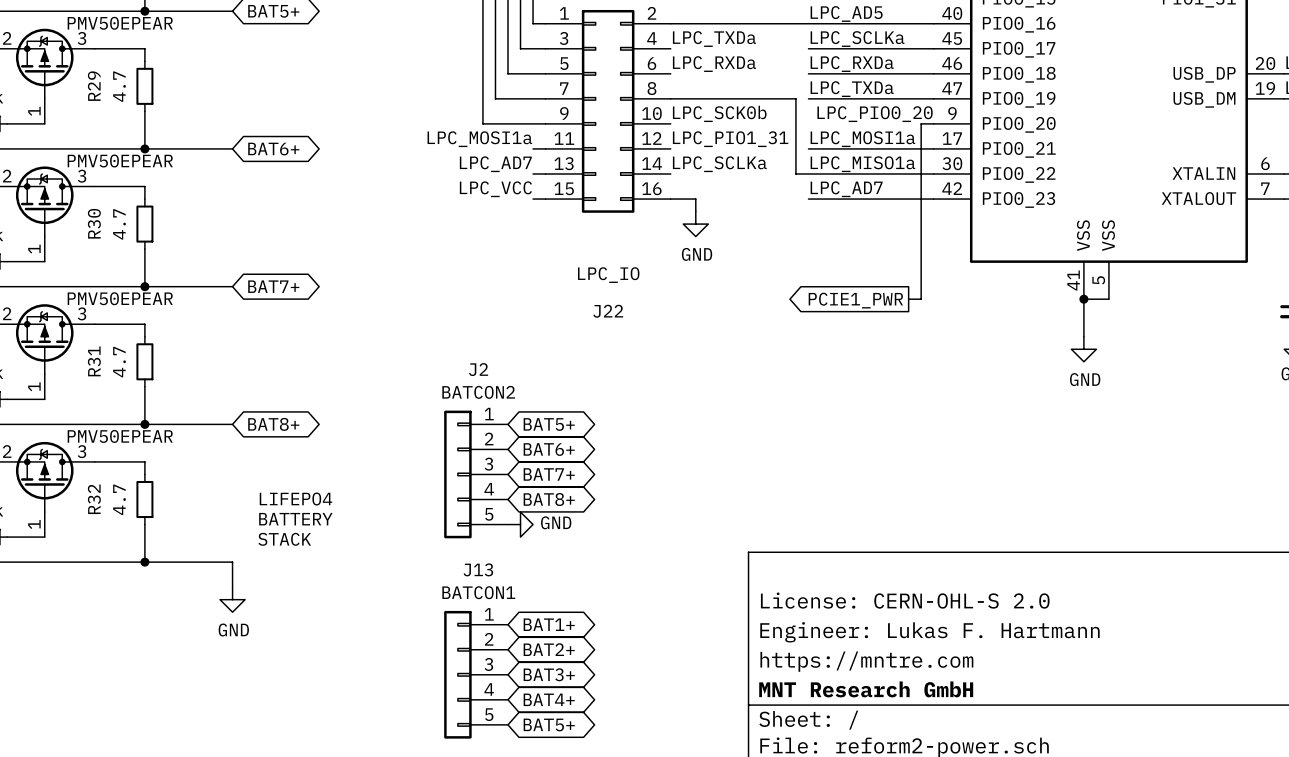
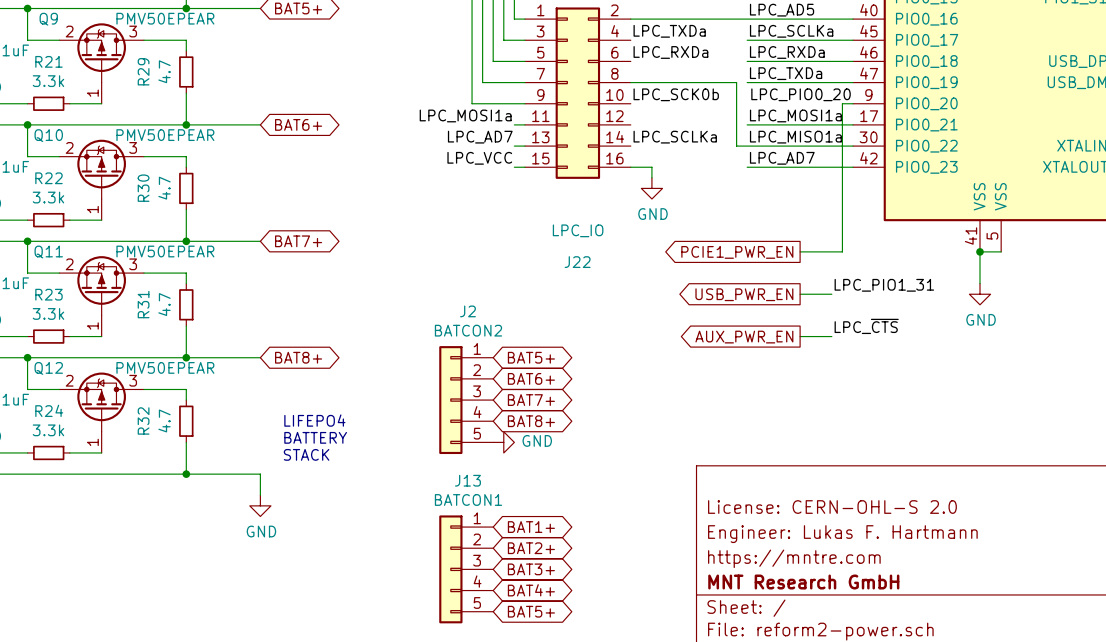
label: LPC_PIO1_31 (730, 139) -> none
wire: none -> (800, 251) (831, 251)
global label: PCIE1_PWR (855, 300) -> PCIE1_PWR_EN (737, 252)
label: none -> LPC_PIO1_31 (884, 285)
wire: none -> (800, 294) (831, 294)
global label: none -> USB_PWR_EN (744, 294)
label: none -> LPC_~{CTS} (866, 326)
wire: none -> (800, 336) (831, 336)
global label: none -> AUX_PWR_EN (744, 337)

